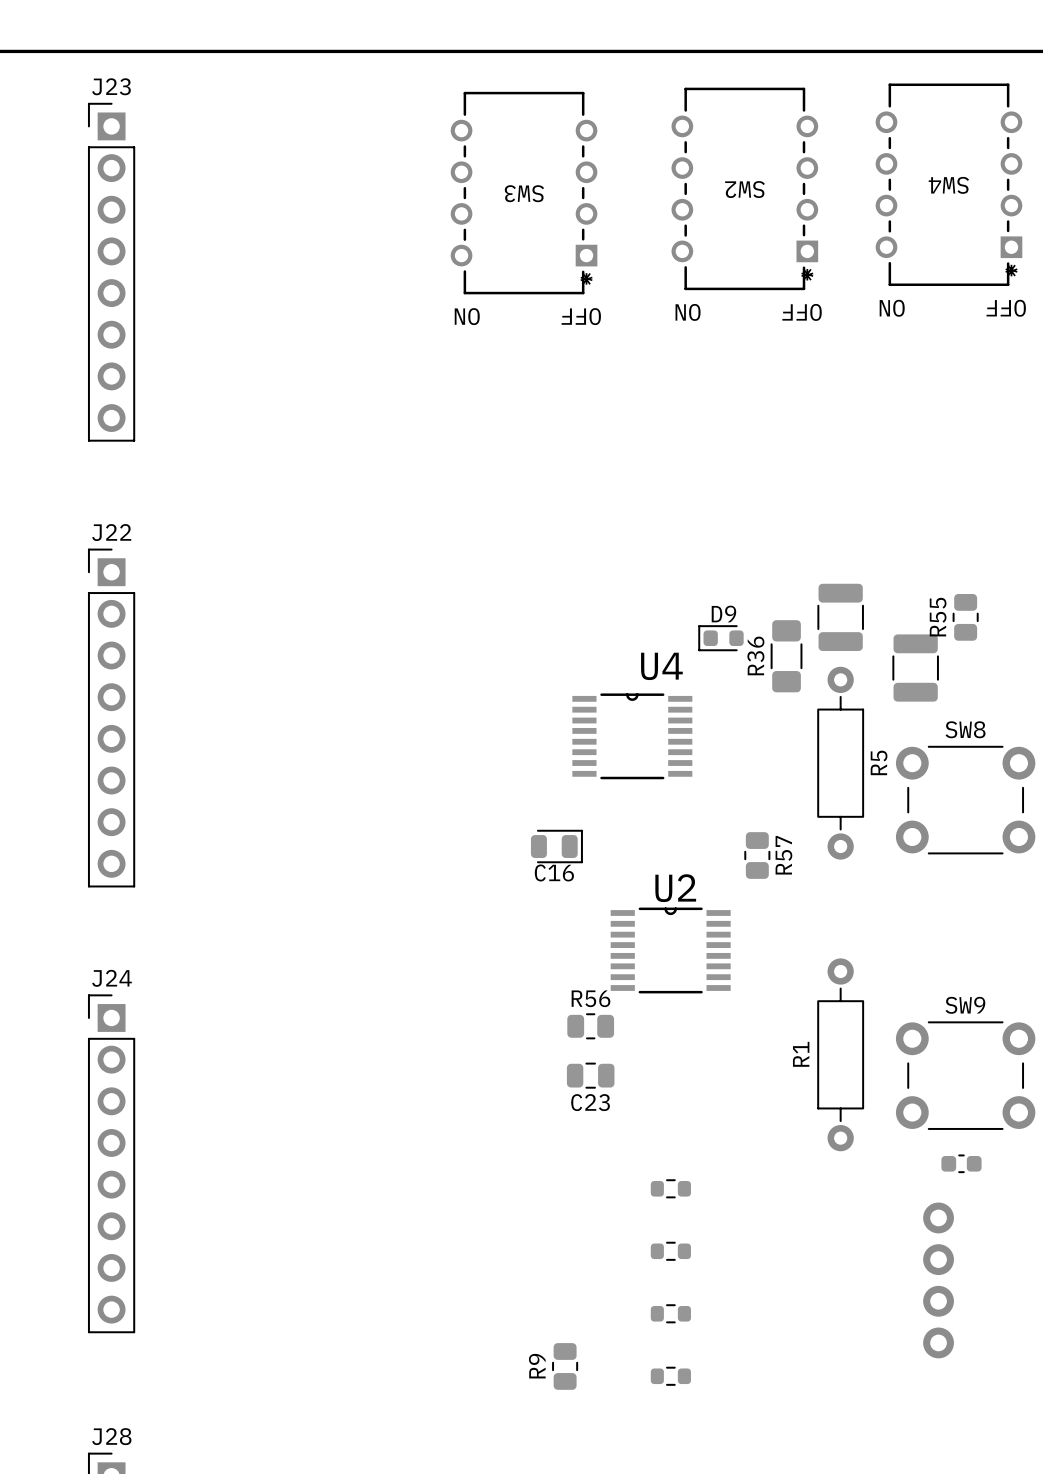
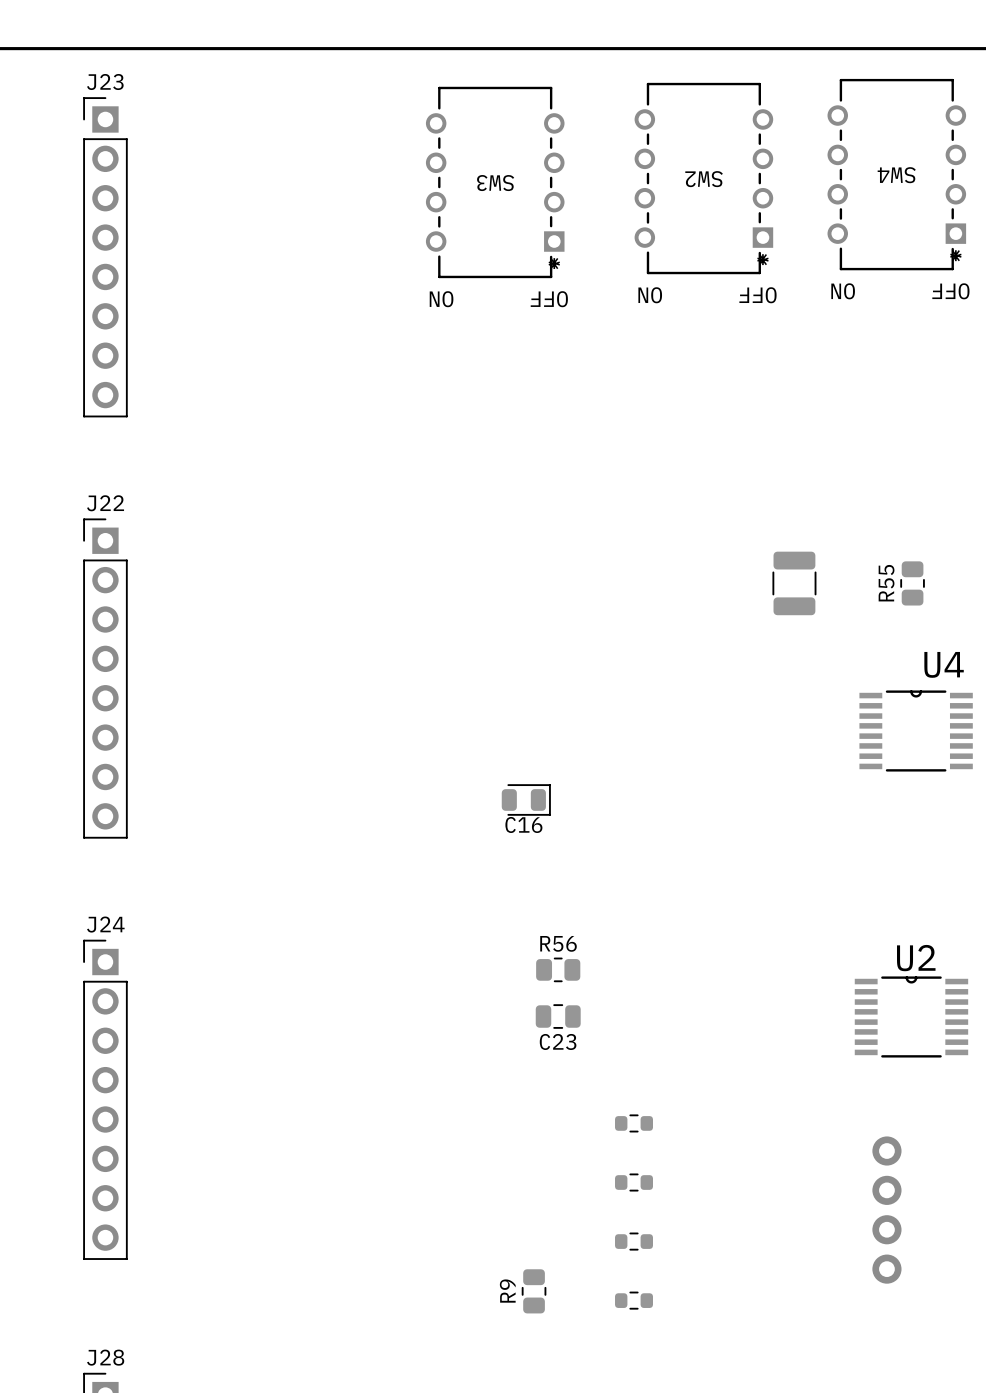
D9: (720, 638) -> none
R36: (786, 656) -> none
part: (915, 668) -> none
U4 position: (632, 736) -> (916, 731)
R5: (840, 763) -> none
SW8: (965, 800) -> none
R57: (757, 855) -> none
U2 position: (670, 950) -> (911, 1016)
R1: (840, 1054) -> none
SW9: (965, 1075) -> none
part: (961, 1163) -> none

